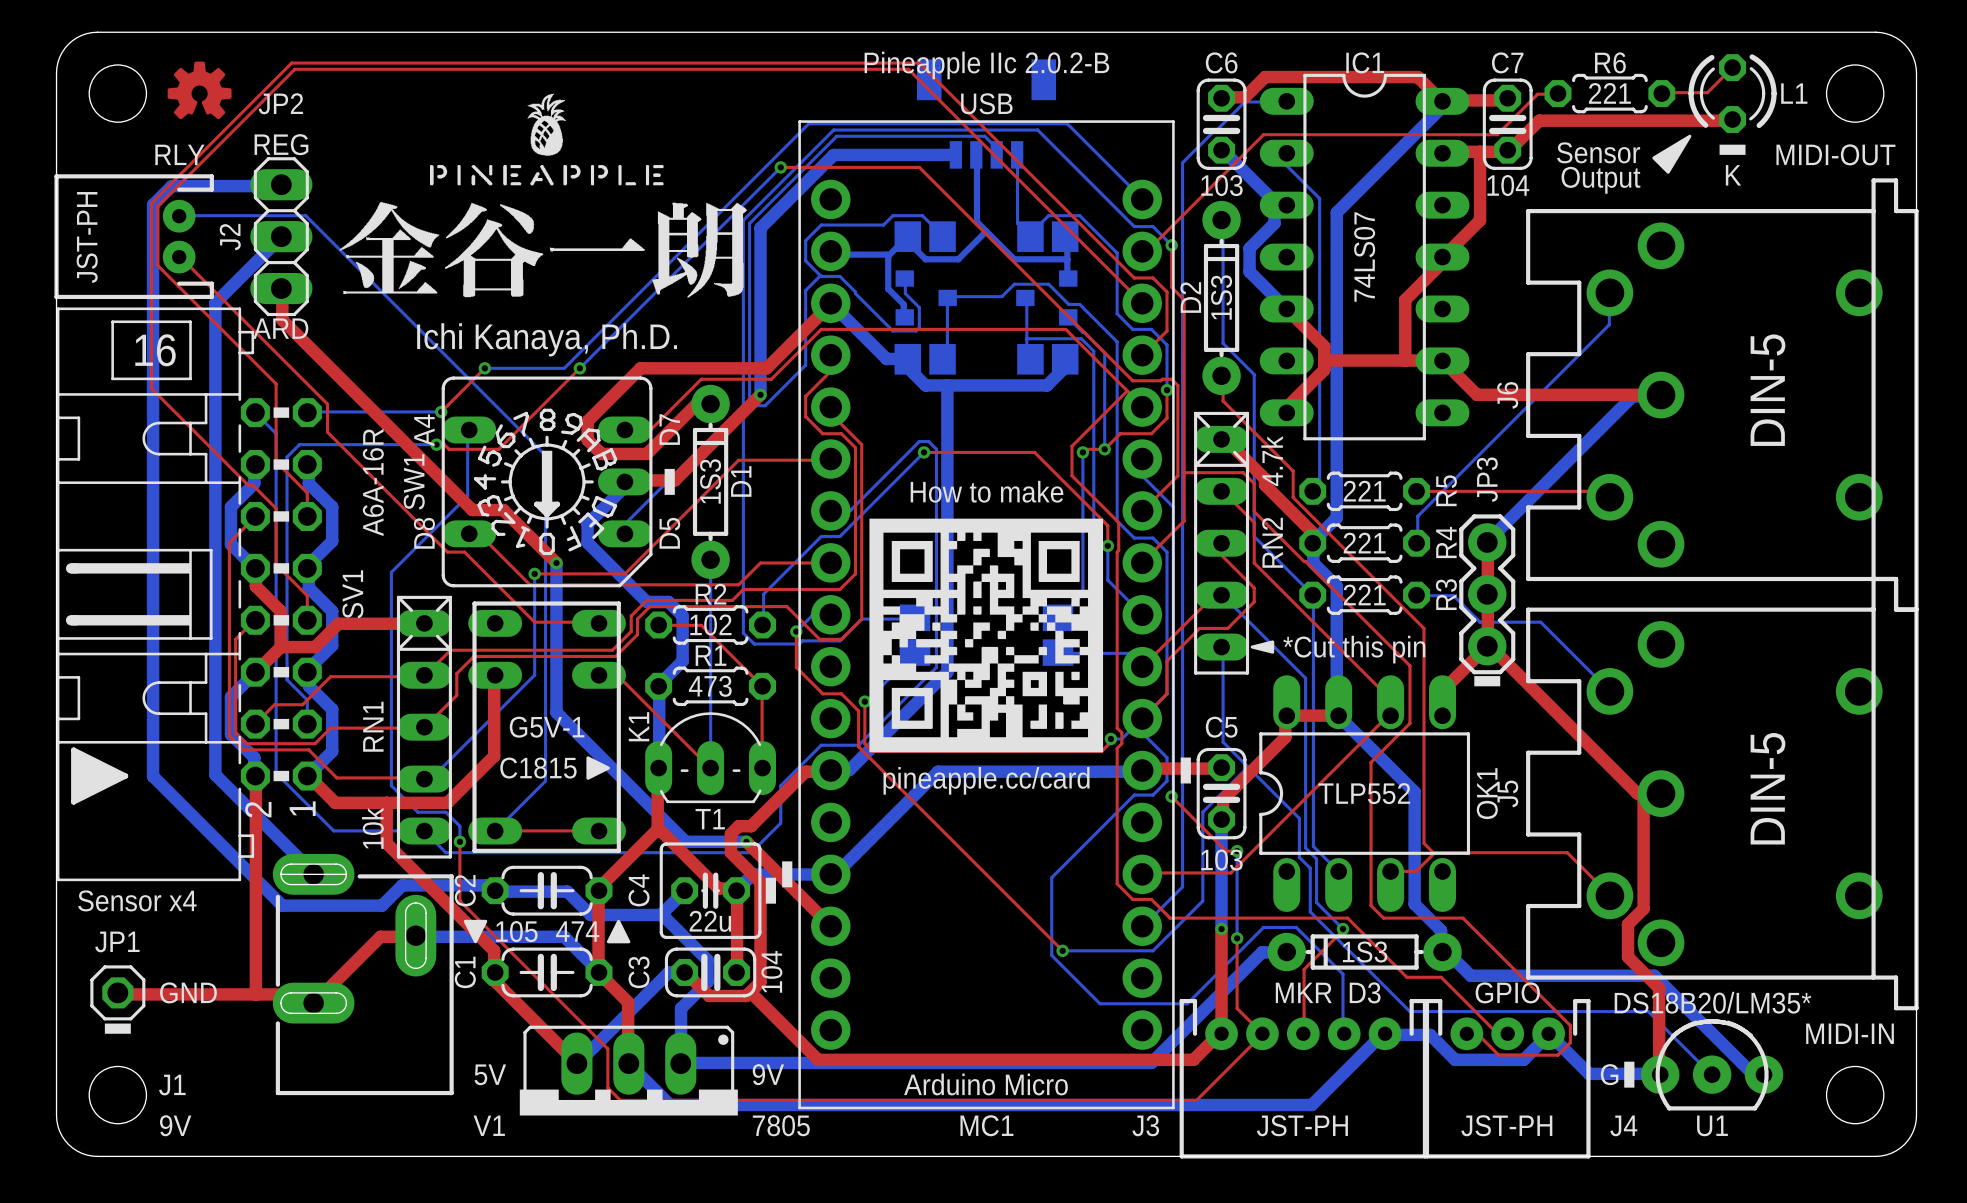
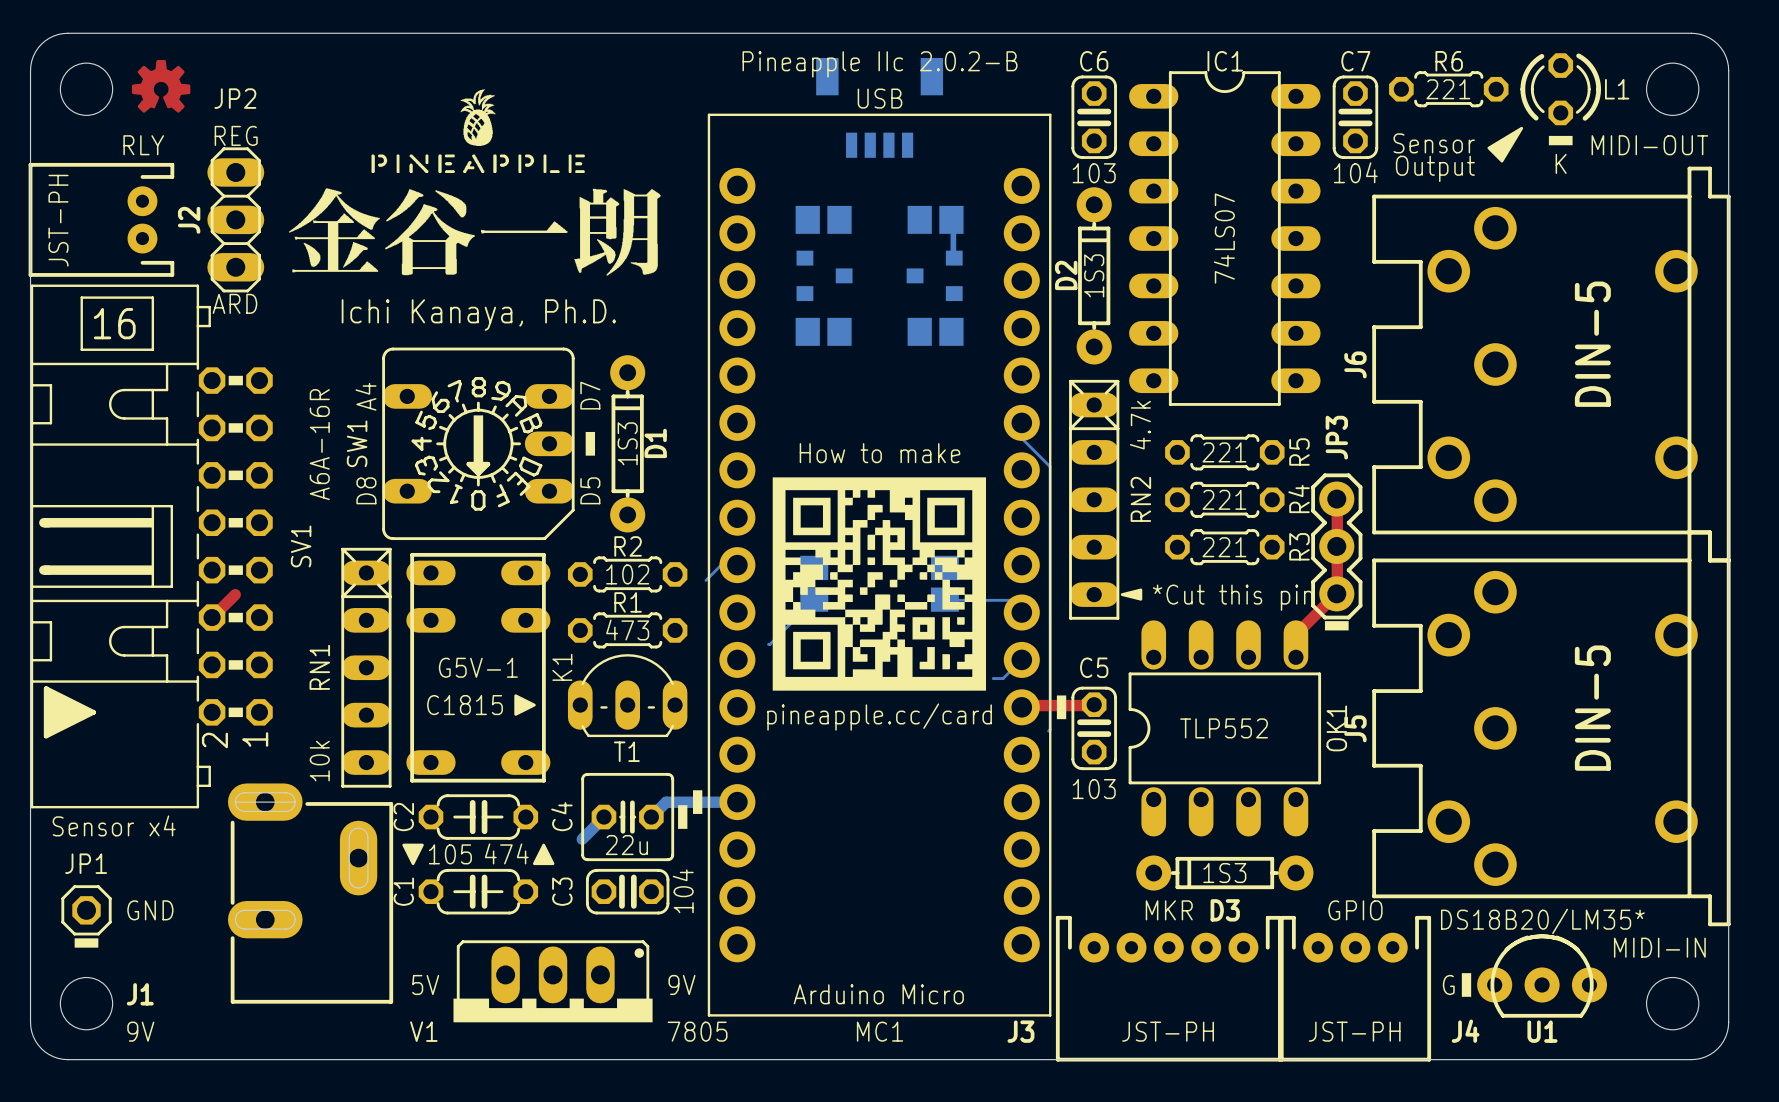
top track: (1732, 67) (1707, 92) (1661, 93) -> none
top track: (1557, 93) (1537, 94) (1497, 134) (1263, 134) (1148, 249) (1142, 251) -> none
top track: (1221, 98) (1244, 97) (1265, 77) (1417, 77) (1442, 101) (1504, 100) (1507, 98) -> none
bottom track: (1286, 101) (1244, 102) (1182, 162) (1182, 886) (1142, 926) -> none
bottom track: (1442, 101) (1441, 108) (1336, 212) (1336, 517) (1312, 543) (1313, 563) (1336, 586) (1336, 709) (1338, 715) (1414, 791) (1414, 904) (1441, 930) (1442, 952) (1448, 953) (1470, 975) (1654, 975) (1752, 1073) (1764, 1074) -> none
top track: (1732, 119) (1539, 120) (1512, 147) (1504, 151) (1442, 153) -> none
bottom track: (1221, 150) (1277, 204) (1286, 205) (1274, 209) (1274, 223) (1249, 248) (1249, 271) (1286, 308) -> none
top track: (1480, 151) (1480, 220) (1441, 257) (1441, 263) (1405, 299) (1405, 360) -> none
bottom track: (1286, 153) (1286, 165) (1319, 198) (1319, 483) (1312, 491) -> none
bottom track: (955, 154) (833, 154) (760, 228) (760, 394) -> none
bottom track: (976, 154) (976, 221) (1014, 259) (1067, 259) -> none
bottom track: (996, 154) (995, 147) (984, 136) (836, 136) (749, 223) (749, 399) (755, 405) (765, 405) (805, 365) (805, 290) (820, 275) -> none
bottom track: (1017, 154) (1017, 223) (1030, 236) (1029, 234) (1048, 215) (1079, 215) (1117, 253) (1117, 313) (1132, 329) (1151, 329) (1167, 344) (1167, 390) -> none
top track: (780, 167) (919, 167) (1132, 380) (1171, 379) (1177, 385) (1177, 475) (1142, 510) -> none
bottom track: (780, 167) (579, 368) -> none
via: (780, 167) -> none
bottom track: (281, 184) (171, 186) (153, 204) (153, 776) (282, 905) (382, 905) (402, 885) (486, 885) (495, 891) (567, 891) (590, 915) (660, 915) (707, 960) (707, 981) (681, 1008) (680, 1063) (1151, 1062) (1262, 952) (1286, 952) -> none
bottom track: (1142, 199) (1067, 123) (808, 123) (564, 368) (484, 368) -> none
bottom track: (179, 216) (305, 215) (545, 455) (545, 781) (495, 831) -> none
bottom track: (1221, 220) (1223, 220) (1223, 343) (1254, 374) (1254, 536) (1313, 595) (1313, 846) (1338, 871) -> none
bottom track: (986, 231) (958, 259) (925, 259) (906, 240) (907, 236) (888, 256) -> none
bottom track: (281, 236) (215, 302) (215, 774) (313, 874) -> none
bottom track: (942, 236) (922, 215) (892, 215) (883, 225) (821, 225) (805, 240) (805, 260) (821, 276) (839, 276) (892, 330) (916, 330) (919, 327) (919, 307) (905, 293) (904, 278) -> none
top track: (1171, 245) (1171, 287) (1184, 299) (1184, 520) (1142, 562) -> none
bottom track: (1171, 245) (1152, 226) (1134, 226) (1037, 130) (833, 130) (743, 220) (743, 405) (625, 524) (624, 533) -> none
via: (1171, 245) -> none
bottom track: (830, 251) (835, 254) (886, 254) (888, 256) -> none
bottom track: (888, 256) (888, 288) (903, 304) (904, 317) -> none
top track: (179, 257) (327, 404) (327, 432) (447, 552) (464, 552) (534, 622) (598, 623) -> none
top track: (281, 288) (282, 320) (472, 510) (503, 510) (556, 563) -> none
bottom track: (1609, 292) (1609, 324) (1417, 516) (1416, 543) -> none
bottom track: (947, 297) (1001, 296) (1014, 284) (1048, 284) (1068, 304) (1079, 304) (1117, 341) (1117, 520) (1134, 538) (1152, 538) (1167, 552) (1167, 693) (1135, 726) (1167, 757) (1167, 781) (1152, 795) (1134, 795) (1051, 877) (1051, 955) (1100, 1003) (1187, 1003) (1263, 927) (1296, 927) (1343, 974) (1344, 1033) -> none
bottom track: (1025, 297) (1026, 355) (1030, 359) -> none
bottom track: (947, 298) (947, 354) (942, 358) -> none
top track: (1142, 302) (908, 69) (294, 69) (157, 206) (157, 265) (276, 383) (276, 461) (307, 492) (307, 516) -> none
top track: (830, 303) (766, 368) (640, 368) (587, 421) (587, 439) (601, 453) (646, 453) (696, 404) (710, 404) -> none
bottom track: (830, 303) (886, 358) (907, 359) (908, 368) (925, 385) (1047, 385) (1064, 368) (1065, 359) -> none
top track: (1286, 309) (1324, 346) (1324, 369) (1286, 407) (1286, 412) -> none
bottom track: (1068, 317) (1104, 352) (1104, 449) -> none
bottom track: (1026, 338) (1081, 338) (1093, 351) (1093, 653) -> none
top track: (830, 355) (830, 371) (805, 396) (805, 416) (822, 433) (841, 433) (855, 447) (855, 573) (839, 589) (743, 589) (732, 600) (646, 600) (631, 615) (631, 631) (612, 650) (450, 650) (424, 676) (330, 676) (302, 704) (274, 704) (255, 724) -> none
top track: (1142, 355) (1167, 330) (1167, 292) (1152, 277) (1134, 277) (919, 63) (291, 63) (151, 203) (151, 388) (248, 485) (252, 485) (276, 508) (276, 564) (307, 595) (307, 620) -> none
top track: (1324, 360) (1441, 360) (1476, 394) (1660, 394) -> none
top track: (484, 368) (441, 411) -> none
via: (484, 368) -> none
top track: (579, 368) (498, 449) (449, 449) (444, 444) (436, 444) -> none
via: (579, 368) -> none
top track: (1221, 375) (1223, 401) (1293, 471) (1293, 497) (1423, 628) (1423, 843) (1434, 853) -> none
bottom track: (947, 385) (947, 672) (849, 770) (830, 770) -> none
top track: (1127, 390) (1072, 446) (1072, 475) (1118, 522) (1117, 728) (1121, 732) (1121, 743) (1117, 748) (1117, 883) (1132, 899) (1151, 899) (1170, 918) (1347, 918) (1406, 977) (1441, 977) (1497, 1033) (1507, 1033) -> none
top track: (1167, 390) (1167, 418) (1151, 433) (1120, 433) (1104, 449) (1086, 449) (1082, 452) -> none
via: (1167, 390) -> none
top track: (760, 394) (674, 480) (624, 481) -> none
via: (760, 394) -> none
bottom track: (1661, 395) (1632, 396) (1487, 542) -> none
bottom track: (755, 404) (743, 416) (743, 633) (754, 644) (799, 644) (802, 640) (839, 640) (861, 619) (914, 617) -> none
top track: (830, 407) (832, 415) (861, 444) (861, 619) (841, 639) (819, 639) (786, 606) (649, 606) (637, 619) (637, 634) (615, 656) (473, 656) (456, 673) (456, 695) (424, 728) (330, 728) (315, 743) (246, 743) (235, 732) (235, 639) (255, 620) -> none
top track: (1142, 407) (1065, 329) (821, 329) (771, 379) (701, 379) (651, 429) (624, 429) -> none
bottom track: (441, 411) (307, 412) -> none
via: (441, 411) -> none
bottom track: (255, 412) (276, 433) (276, 773) (333, 830) (424, 830) -> none
bottom track: (469, 429) (467, 496) (391, 572) (391, 785) (417, 812) (445, 812) (459, 826) (459, 841) -> none
top track: (1221, 439) (1226, 439) (1265, 478) (1265, 485) (1311, 531) (1312, 543) -> none
bottom track: (436, 444) (299, 444) (287, 457) (287, 679) (307, 700) (307, 724) -> none
via: (436, 444) -> none
via: (1104, 449) -> none
top track: (924, 452) (1034, 452) (1107, 525) (1107, 545) -> none
bottom track: (924, 452) (839, 536) (821, 536) (763, 594) (762, 624) -> none
via: (924, 452) -> none
bottom track: (1082, 452) (1082, 594) (1058, 617) -> none
via: (1082, 452) -> none
top track: (830, 459) (738, 460) (625, 573) (534, 573) -> none
bottom track: (255, 464) (254, 483) (230, 506) (230, 544) (255, 568) -> none
bottom track: (307, 464) (308, 483) (332, 506) (332, 541) (307, 568) (308, 587) (332, 611) (332, 645) (307, 672) (308, 686) (332, 709) (332, 751) (307, 776) -> none
top track: (1184, 472) (1243, 472) (1254, 483) (1254, 511) (1409, 665) (1409, 723) (1371, 762) (1371, 905) (1383, 918) (1462, 918) (1570, 1025) (1570, 1042) (1557, 1055) (1498, 1055) (1478, 1034) (1466, 1033) -> none
bottom track: (624, 481) (623, 488) (587, 524) (587, 542) (646, 601) (668, 601) (682, 615) (682, 661) (658, 686) (658, 768) -> none
top track: (1221, 491) (1254, 522) (1254, 563) (1389, 698) (1390, 715) (1388, 715) (1230, 872) (1142, 874) -> none
top track: (1416, 491) (1604, 491) (1609, 497) -> none
bottom track: (830, 510) (850, 510) (919, 441) (928, 441) (936, 449) (936, 667) (858, 745) (821, 745) (780, 785) (780, 823) (751, 852) (445, 852) (424, 831) -> none
top track: (255, 516) (229, 542) (229, 735) (243, 749) (308, 749) (336, 777) (424, 779) -> none
top track: (469, 533) (480, 534) (530, 584) (738, 584) (760, 563) (830, 563) -> none
top track: (1221, 543) (1223, 556) (1254, 587) (1254, 601) (1227, 628) (1199, 628) (1167, 661) (1167, 693) (1142, 718) -> none
bottom track: (1107, 545) (1107, 580) (1142, 614) -> none
via: (1107, 545) -> none
bottom track: (710, 559) (710, 768) -> none
bottom track: (556, 563) (556, 712) (685, 841) (746, 841) -> none
via: (556, 563) -> none
top track: (255, 568) (255, 586) (280, 611) (280, 647) (315, 647) (338, 623) (424, 623) -> none
bottom track: (534, 573) (534, 675) (431, 777) (424, 779) -> none
via: (534, 573) -> none
top track: (1221, 595) (1213, 595) (1142, 666) -> none
bottom track: (1221, 595) (1305, 678) (1305, 848) (1316, 858) (1316, 902) (1343, 929) -> none
bottom track: (1416, 595) (1453, 595) (1480, 622) (1540, 622) (1609, 691) -> none
top track: (658, 624) (701, 625) (762, 686) (762, 768) -> none
top track: (796, 631) (796, 667) (822, 693) (841, 693) (858, 710) (858, 746) (1062, 950) -> none
via: (796, 631) -> none
top track: (1487, 646) (1492, 648) (1637, 793) (1660, 793) -> none
bottom track: (1221, 647) (1223, 647) (1223, 742) (1299, 818) (1299, 857) (1310, 868) (1310, 911) (1409, 1011) (1648, 1011) (1712, 1074) -> none
bottom track: (255, 672) (230, 696) (230, 734) (254, 757) (255, 776) -> none
top track: (495, 675) (494, 756) (447, 802) (335, 802) (307, 776) -> none
top track: (598, 675) (618, 676) (710, 768) -> none
top track: (864, 701) (864, 743) (872, 751) (1101, 751) (1110, 742) (1110, 739) -> none
via: (864, 701) -> none
top track: (1338, 715) (1286, 715) (1285, 737) (1223, 799) (1221, 819) -> none
via: (1110, 739) -> none
bottom track: (1247, 767) (1202, 812) (1202, 900) (1152, 950) (1062, 950) -> none
top track: (658, 768) (657, 829) -> none
top track: (830, 770) (805, 771) (751, 826) (738, 826) (730, 834) (730, 852) (760, 882) (760, 981) (746, 995) (709, 995) (684, 972) -> none
bottom track: (1142, 770) (938, 771) (836, 872) (830, 874) -> none
top track: (255, 776) (255, 994) -> none
top track: (1661, 793) (1643, 798) (1643, 908) (1628, 924) (1628, 957) (1659, 988) (1660, 1074) -> none
top track: (1171, 796) (1226, 851) (1237, 851) -> none
via: (1171, 796) -> none
top track: (386, 802) (386, 843) (494, 950) (495, 981) (576, 1063) -> none
bottom track: (1221, 819) (1221, 929) -> none
top track: (657, 829) (601, 885) (598, 891) (598, 971) (628, 1002) (628, 1063) -> none
top track: (657, 829) (718, 888) (730, 888) (737, 891) (736, 972) -> none
top track: (495, 831) (598, 831) -> none
top track: (459, 841) (459, 900) (607, 1048) (607, 1087) (620, 1100) (1196, 1100) (1262, 1033) (1237, 1008) (1237, 938) -> none
via: (459, 841) -> none
top track: (746, 841) (830, 925) -> none
via: (746, 841) -> none
bottom track: (1237, 851) (1237, 938) -> none
via: (1237, 851) -> none
top track: (1390, 871) (1416, 871) (1434, 852) (1567, 852) (1609, 895) -> none
top track: (1221, 929) (1221, 1033) -> none
via: (1221, 929) -> none
top track: (1343, 929) (1304, 969) (1303, 1033) -> none
via: (1343, 929) -> none
top track: (415, 935) (380, 936) (313, 1003) (305, 994) (118, 994) (117, 992) -> none
bottom track: (415, 935) (564, 936) (598, 972) -> none
via: (1237, 938) -> none
via: (1062, 950) -> none
bottom track: (684, 972) (668, 972) (576, 1063) -> none
top track: (750, 992) (818, 1059) (1193, 1059) (1221, 1033) -> none
bottom track: (628, 1063) (670, 1105) (1311, 1105) (1385, 1033) (1430, 1034) (1455, 1059) (1523, 1059) (1548, 1033) (1589, 1073) (1660, 1074) -> none

